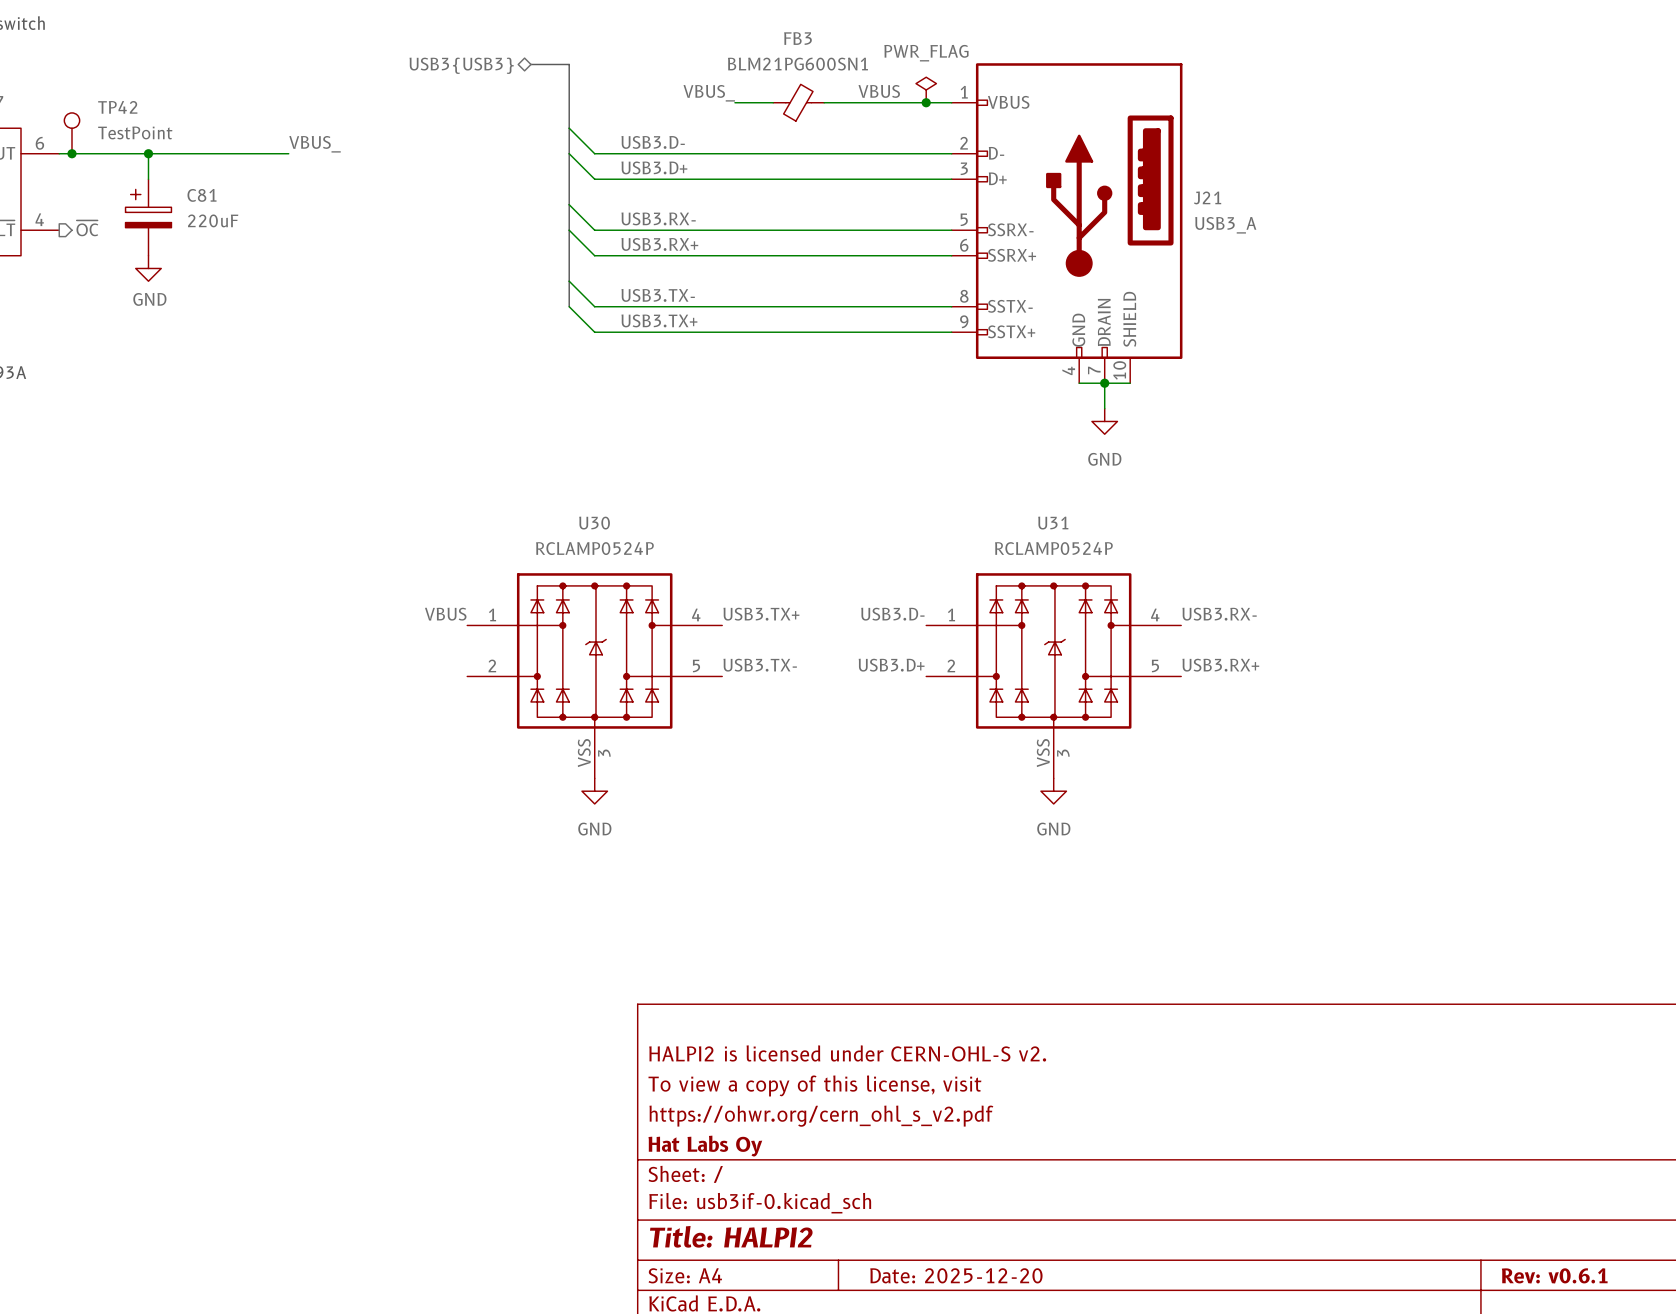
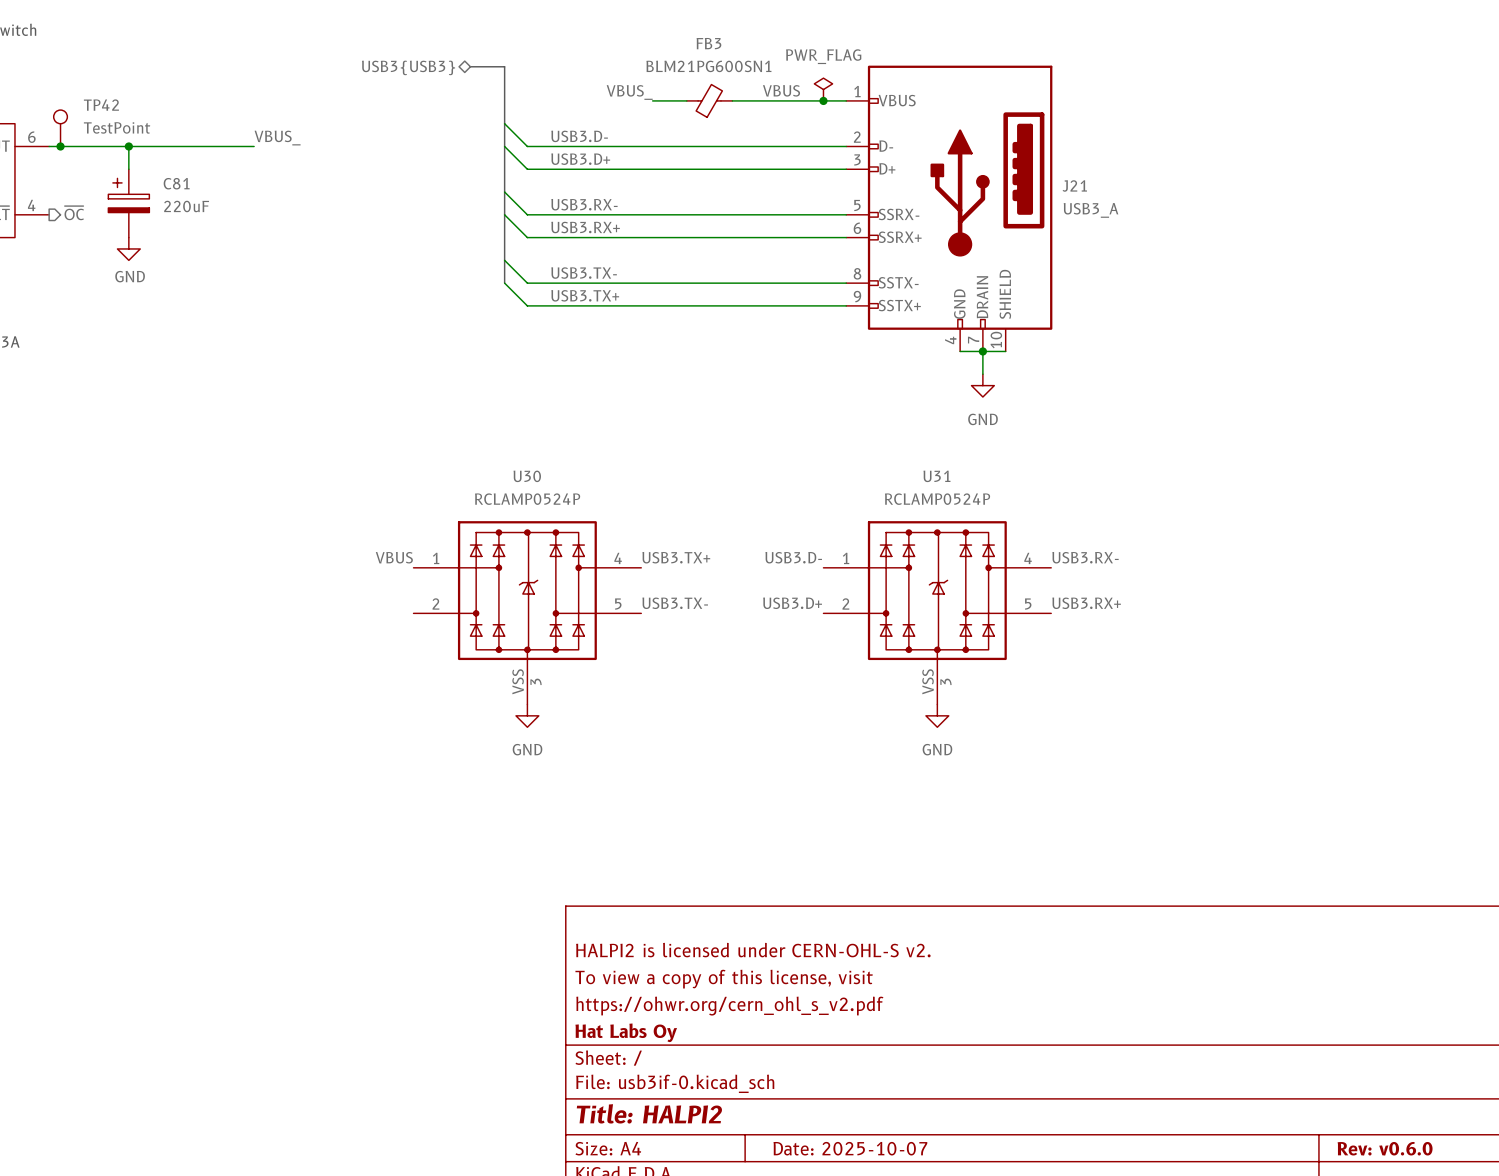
title block: Date: 2025-12-20 (956, 1275) -> Date: 2025-10-07 (850, 1148)
title block: Rev: v0.6.1 (1554, 1275) -> Rev: v0.6.0 (1385, 1148)

